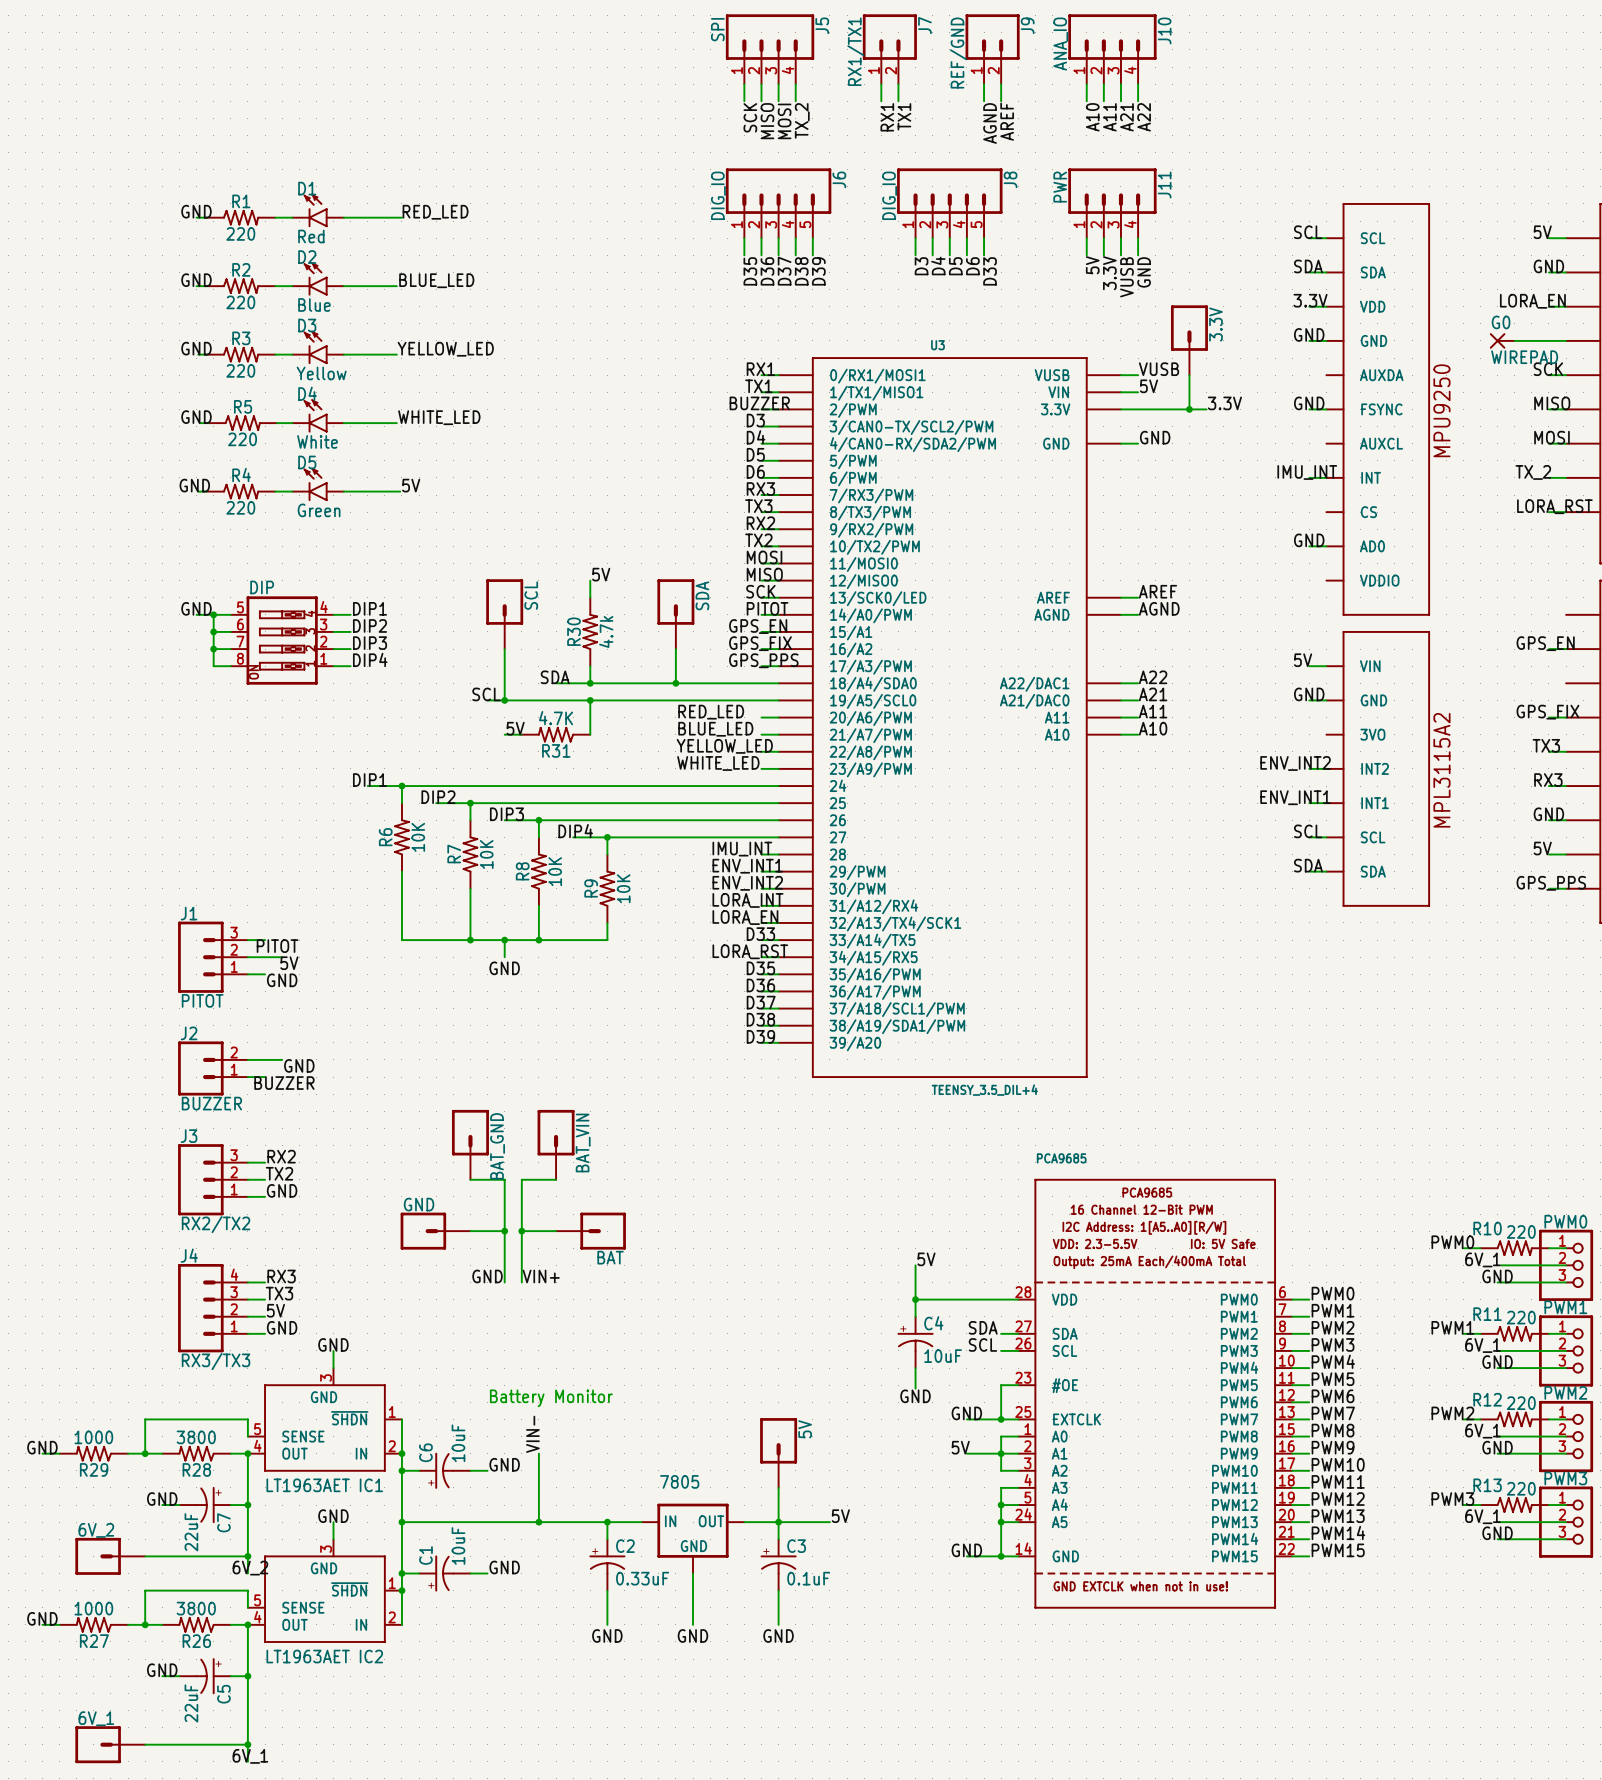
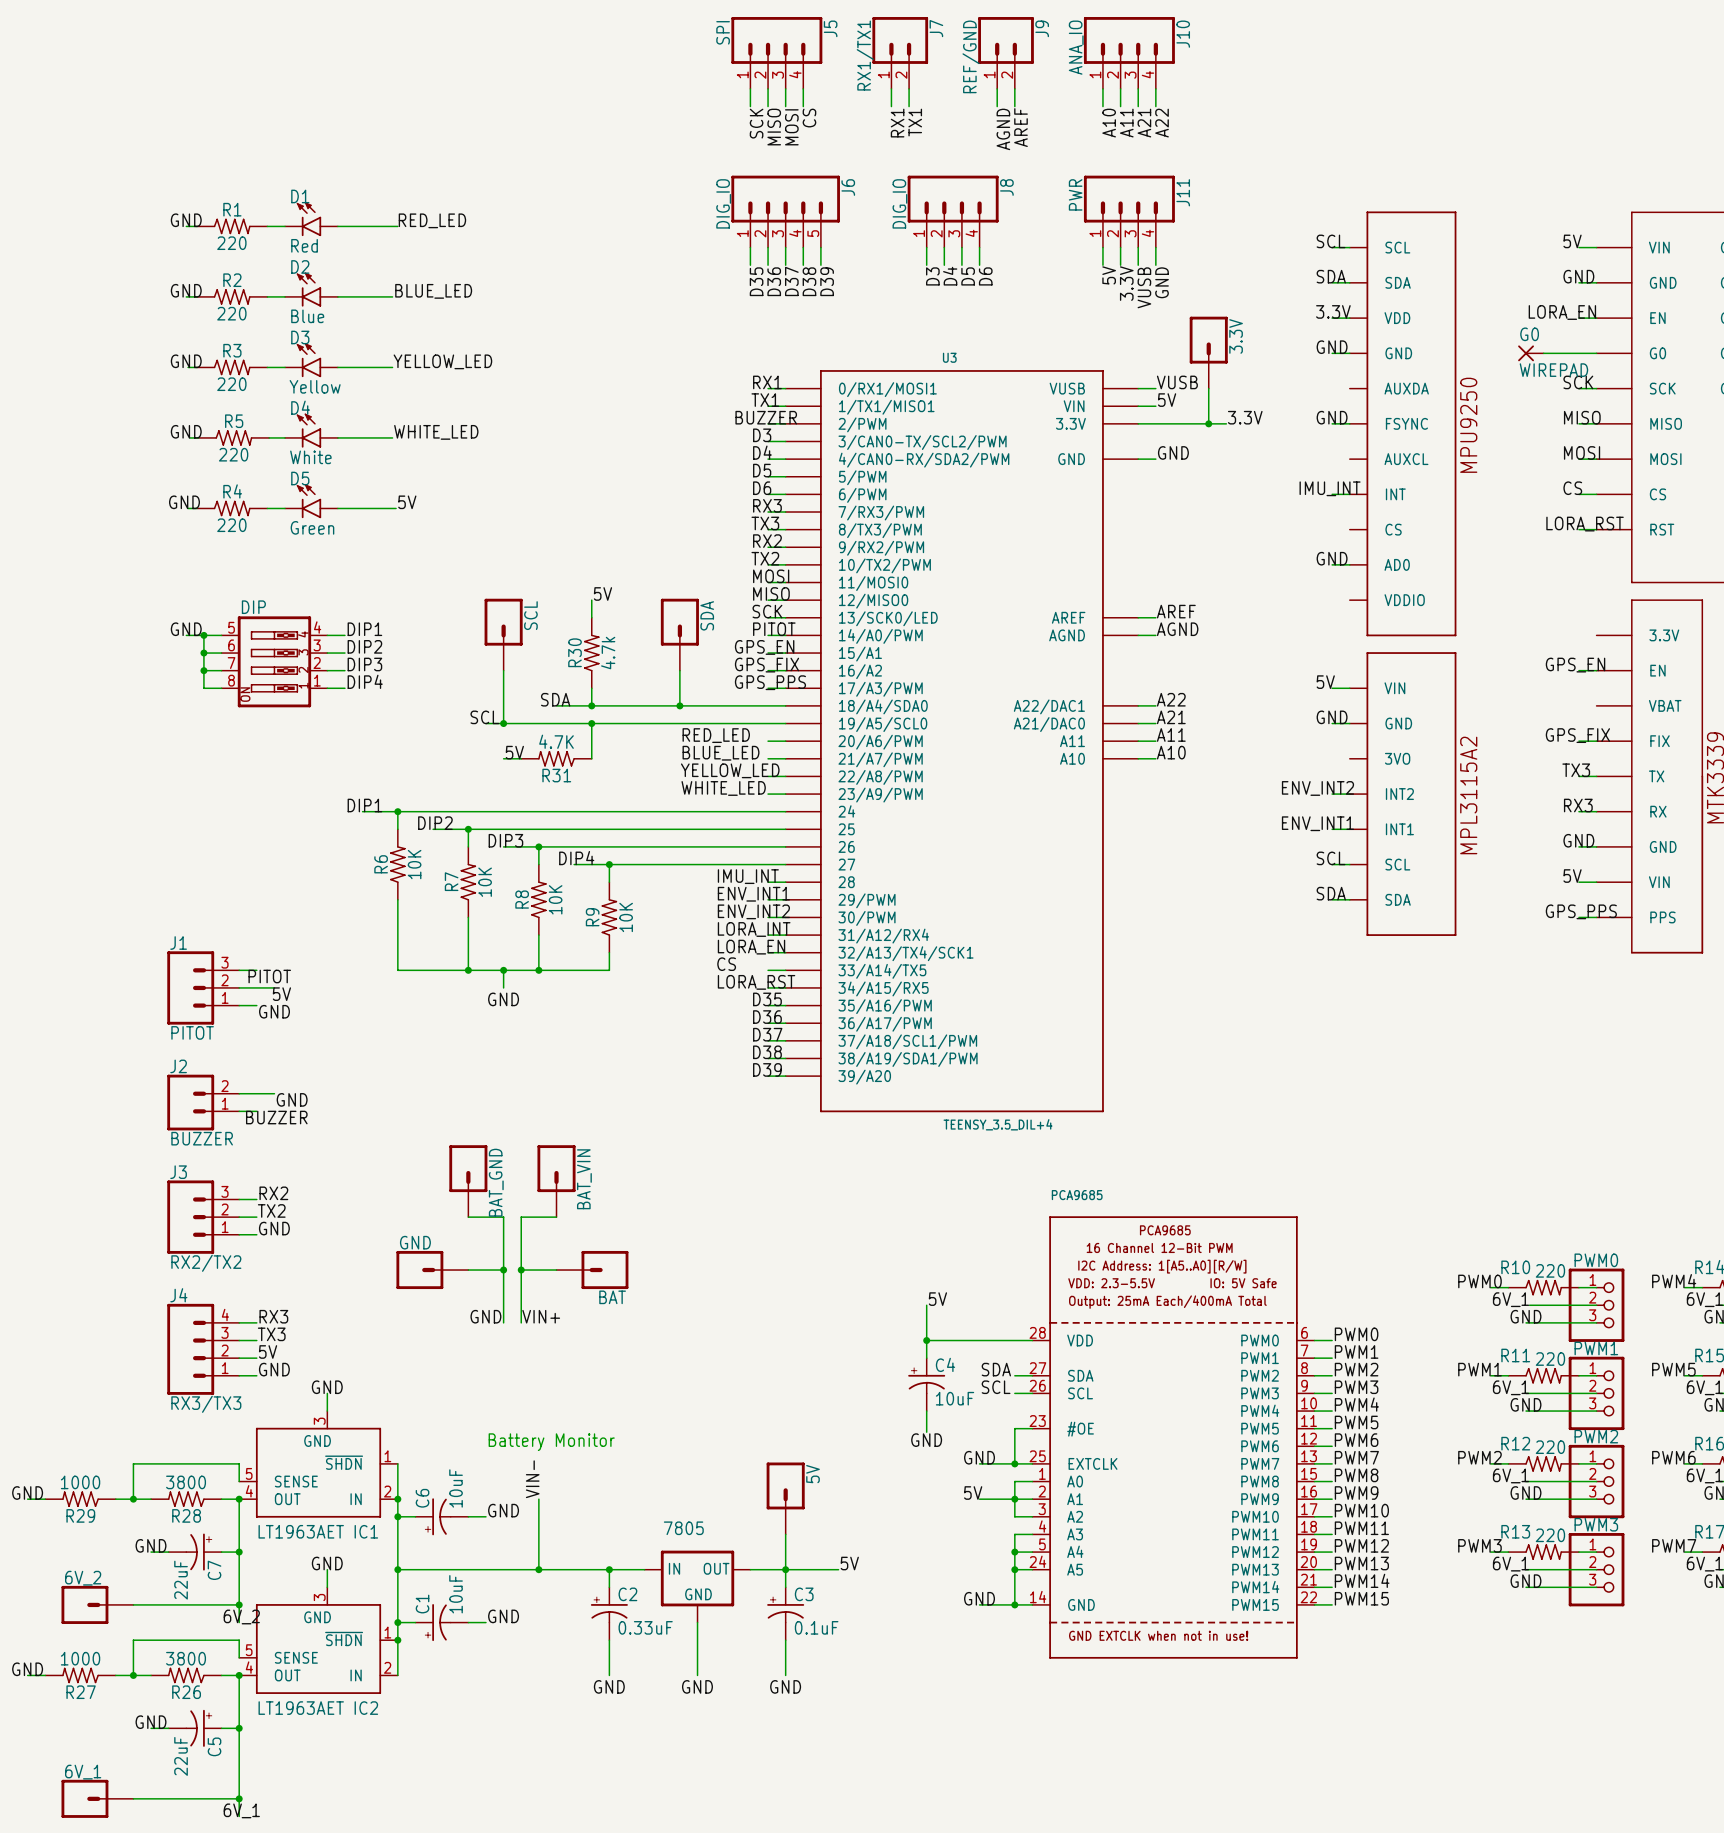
label: TX_2 (802, 120) -> CS (809, 118)
J8 symbol: [897, 168, 1003, 239] -> [907, 175, 999, 248]
wire: (984, 238) (984, 255) -> none
label: D33 (990, 271) -> none
label: none -> CS (1572, 488)
label: TX_2 (1533, 472) -> none
label: none -> CS (726, 964)
label: D33 (760, 934) -> none

